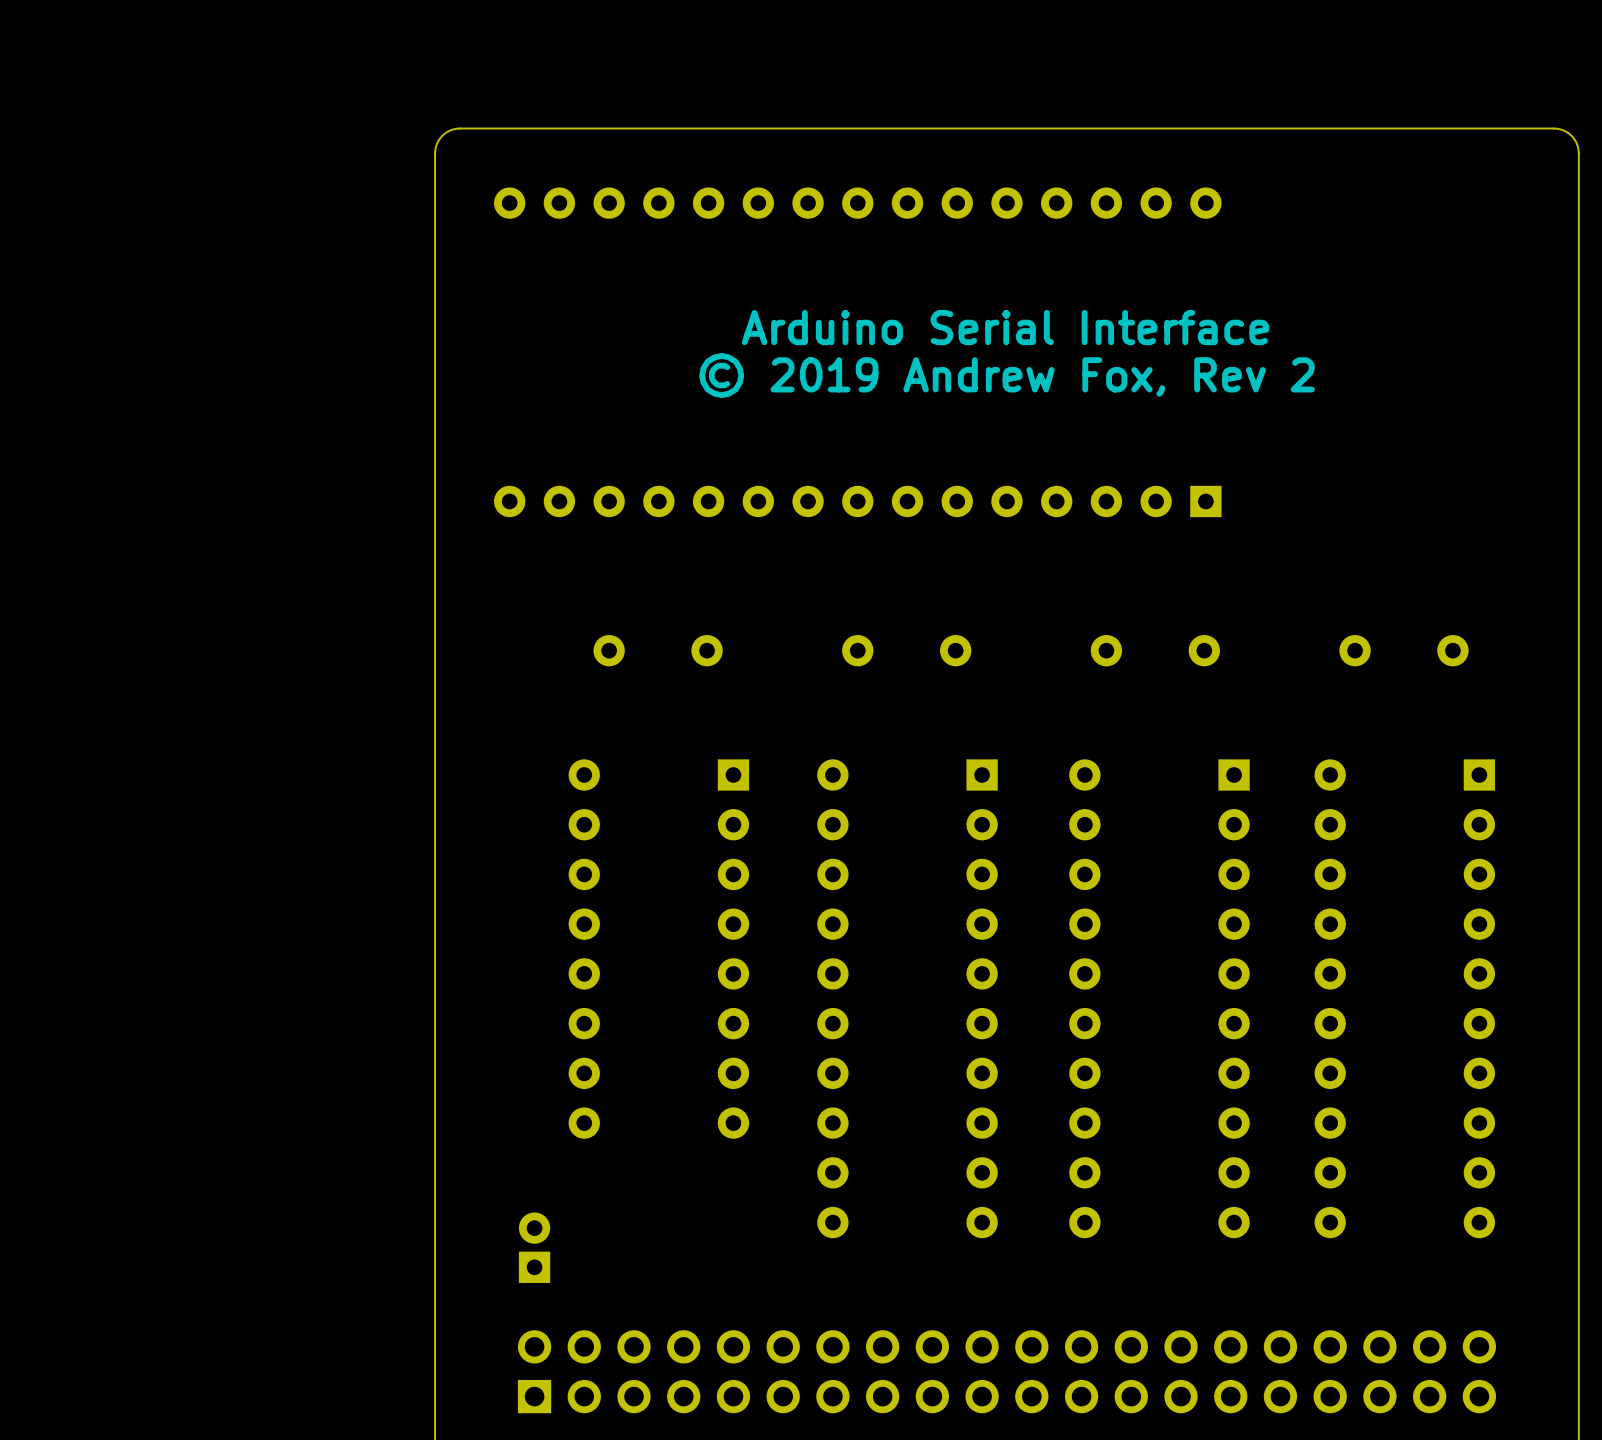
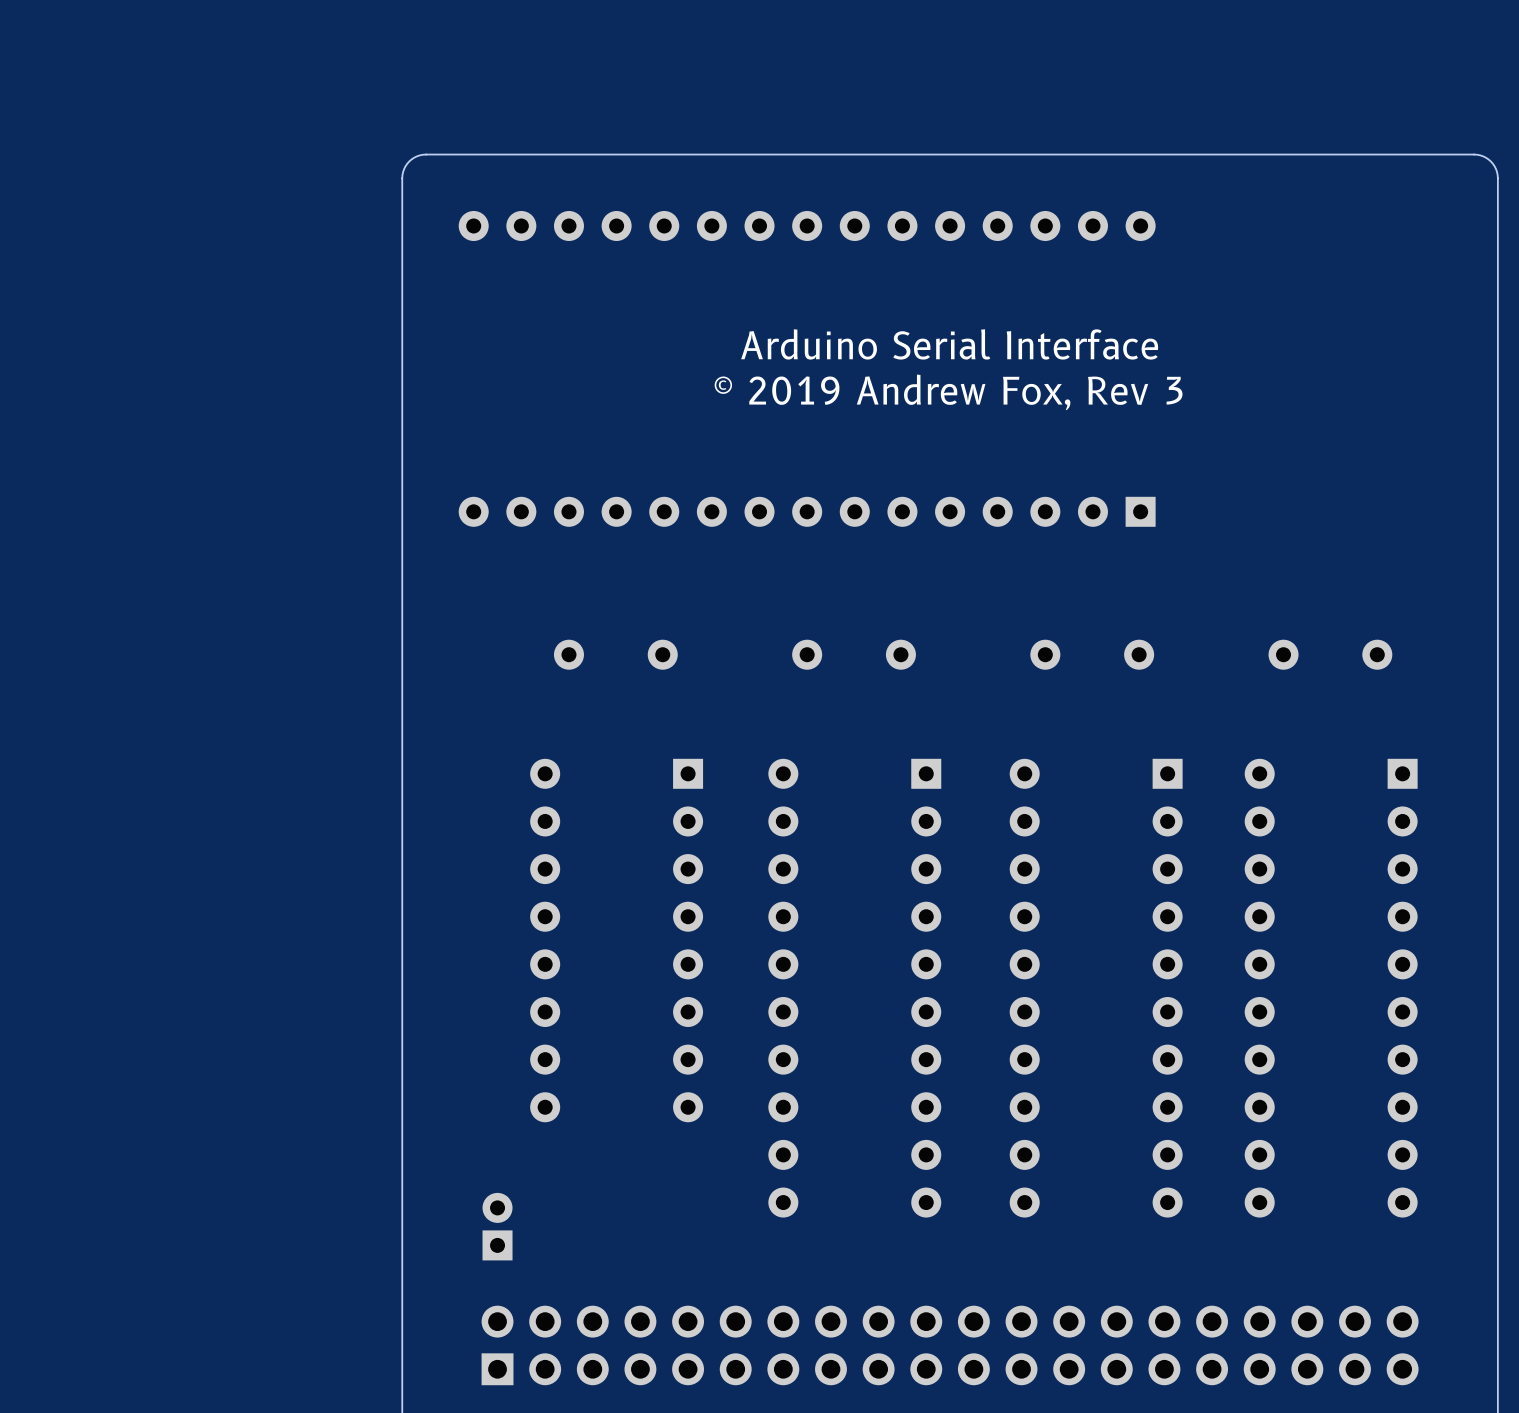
text: © 2019 Andrew Fox, Rev 2 (1006, 375) -> © 2019 Andrew Fox, Rev 3 (948, 392)

